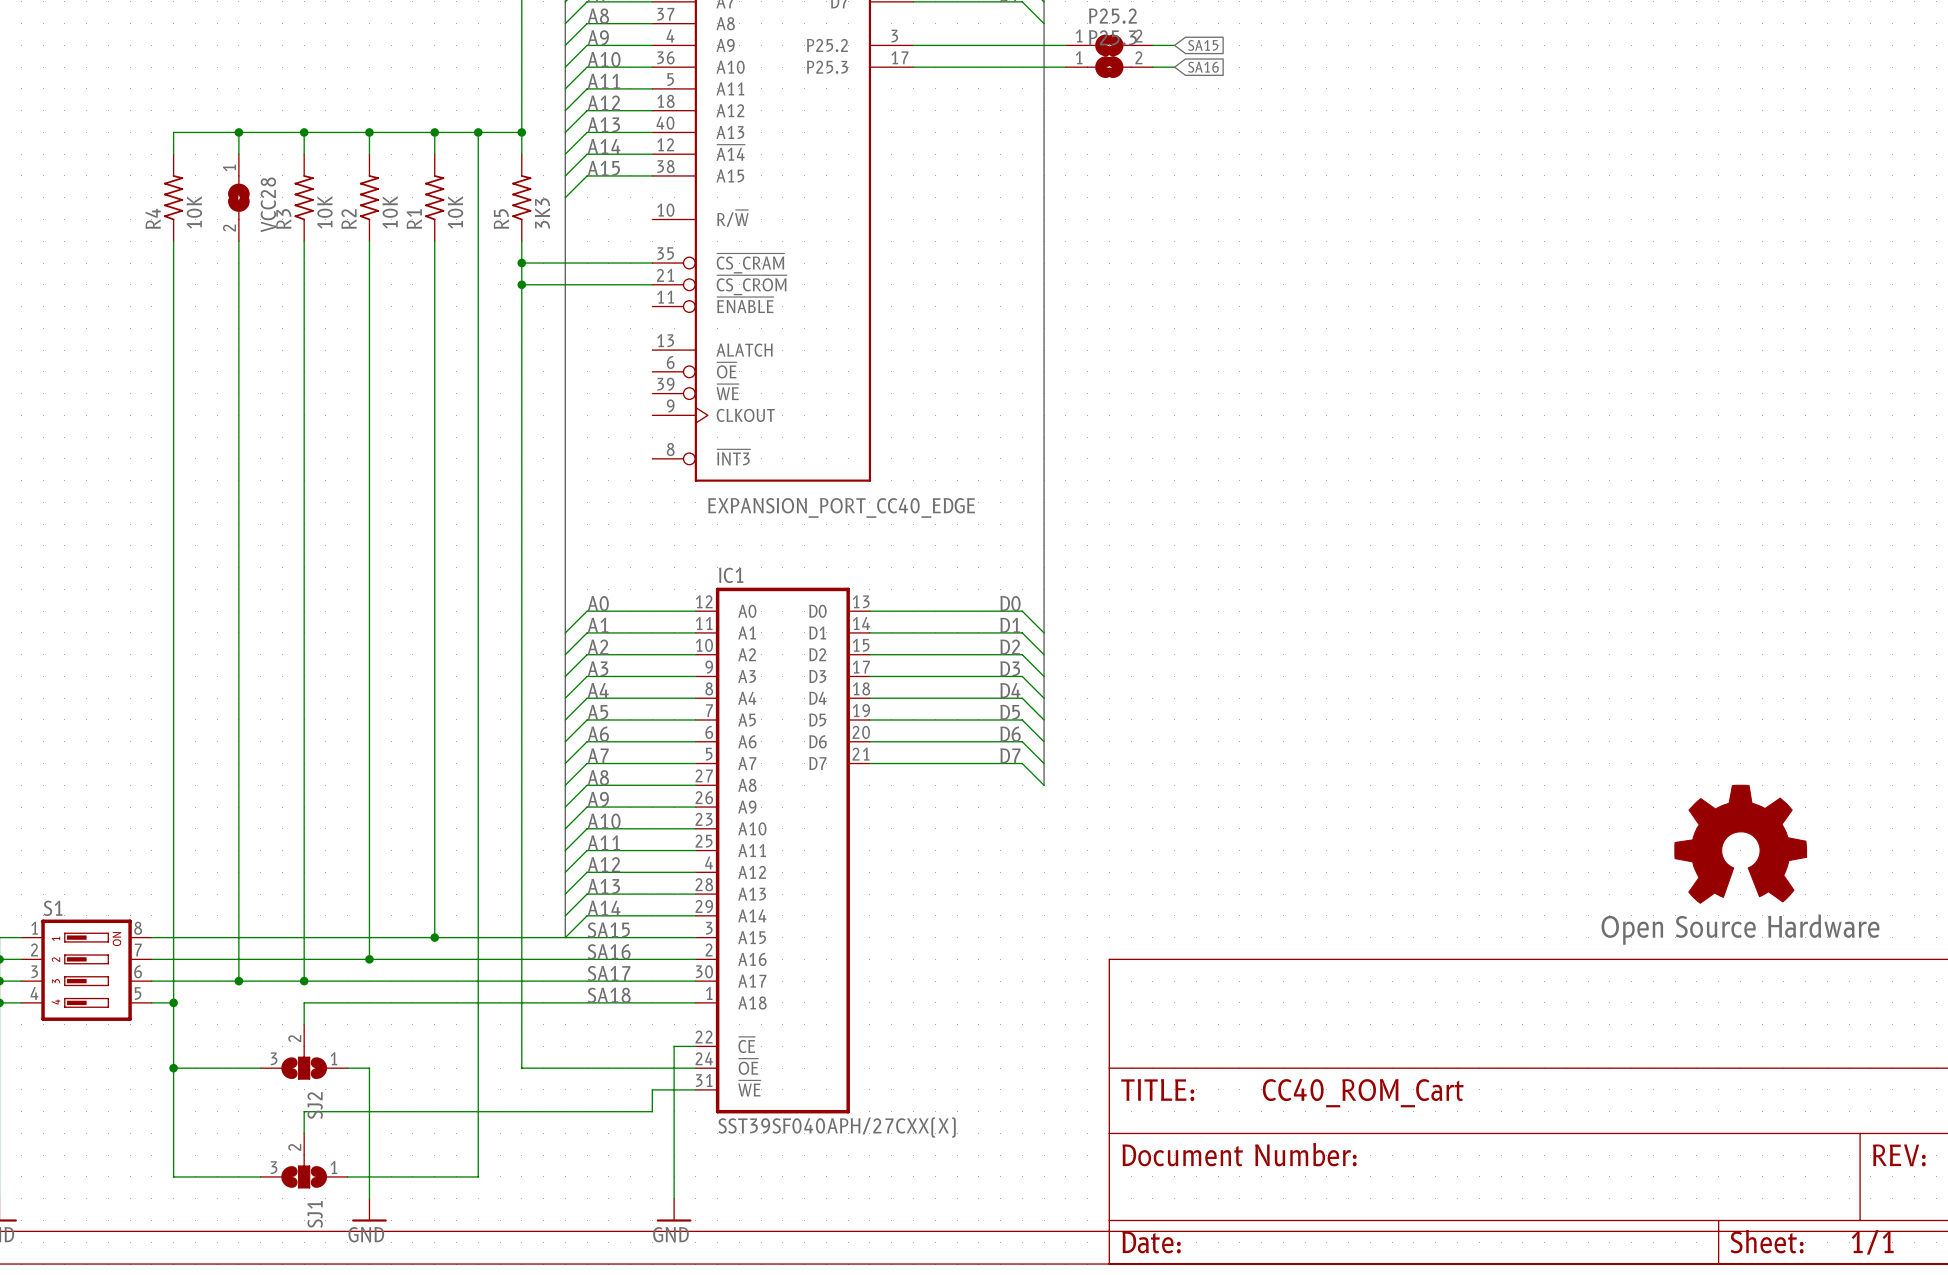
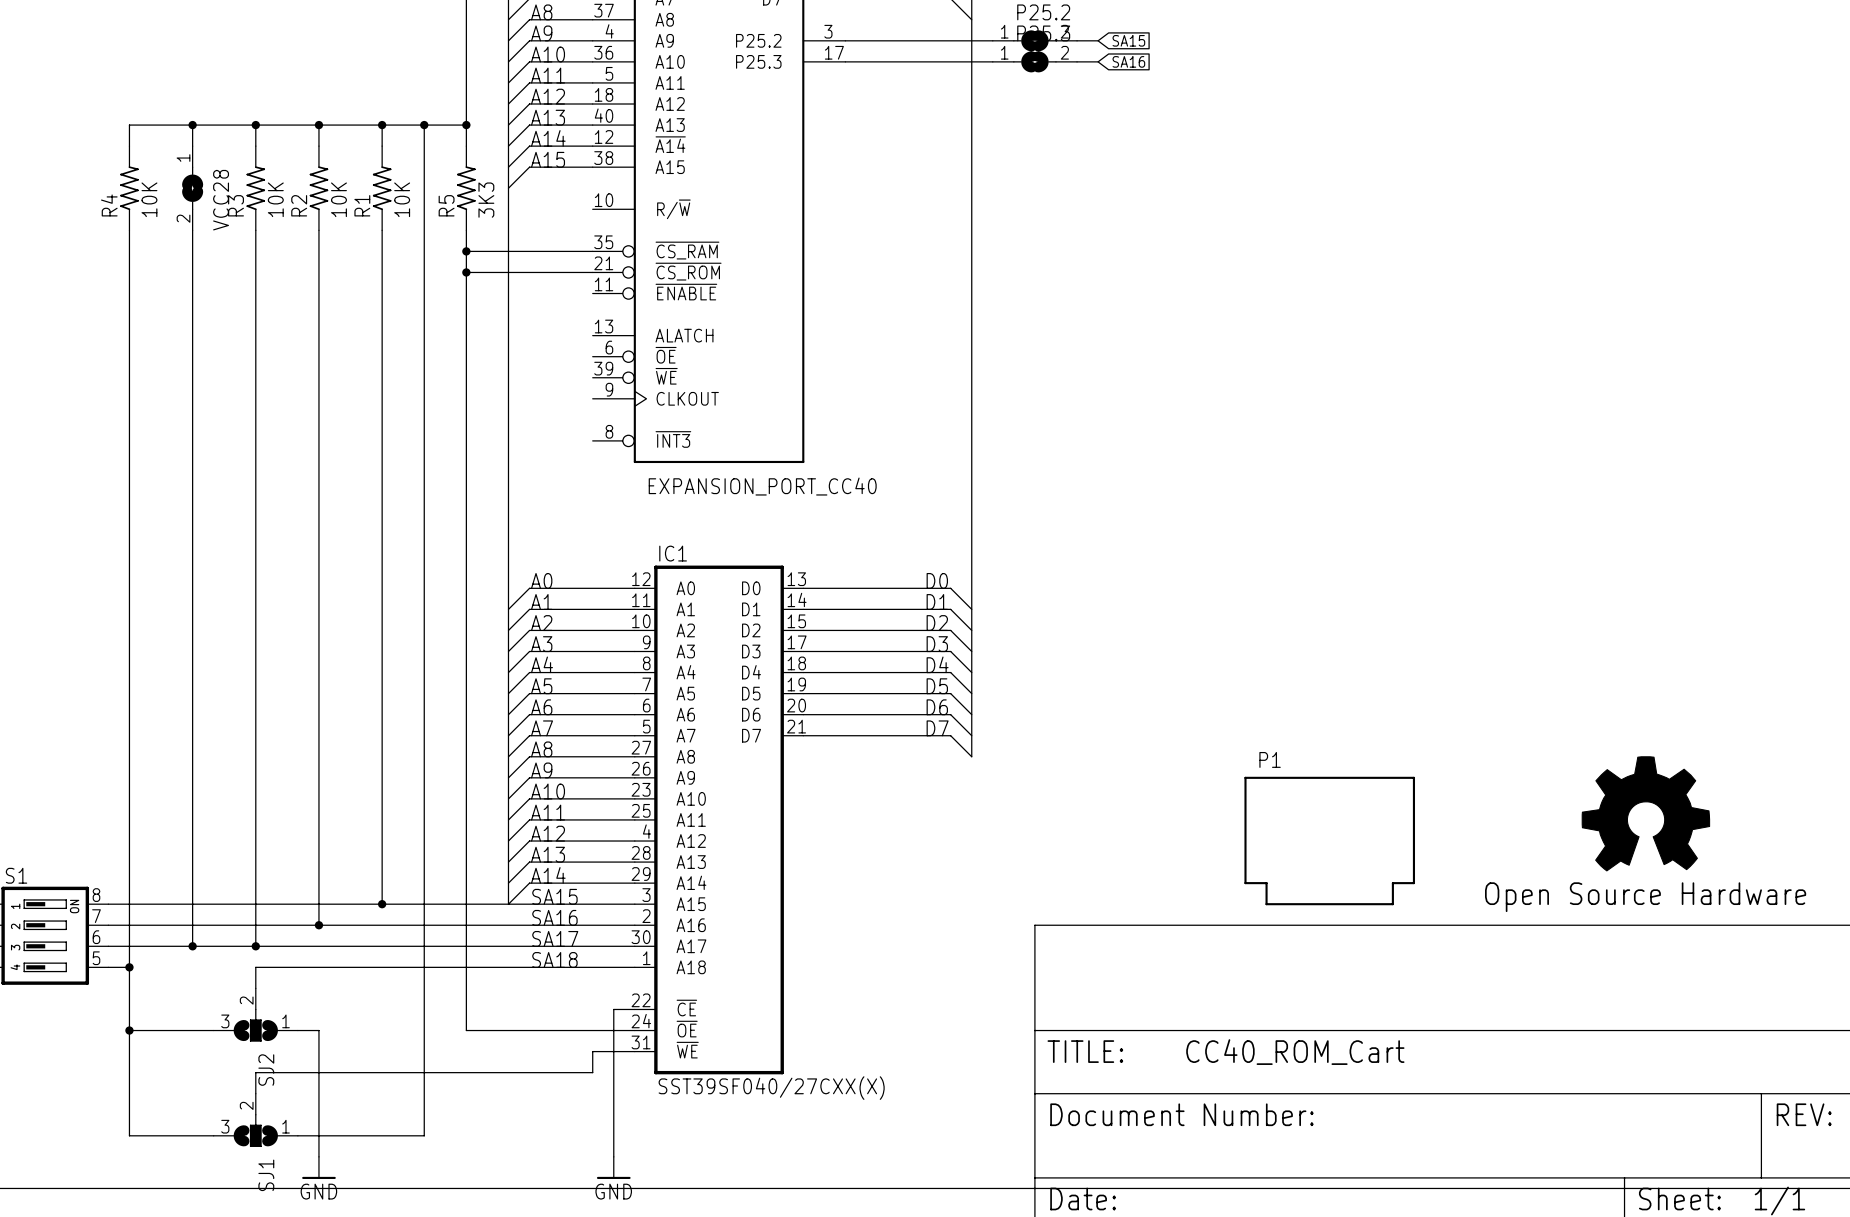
part pin name: ~{CS_CRAM} (750, 263) -> ~{CS_RAM} (687, 250)
part pin name: ~{CS_CROM} (751, 285) -> ~{CS_ROM} (688, 271)
part value: EXPANSION_PORT_CC40_EDGE (841, 507) -> EXPANSION_PORT_CC40 (762, 486)
P1: none -> (1329, 841)
IC1 value: SST39SF040APH/27CXX(X) (837, 1127) -> SST39SF040/27CXX(X) (771, 1088)

